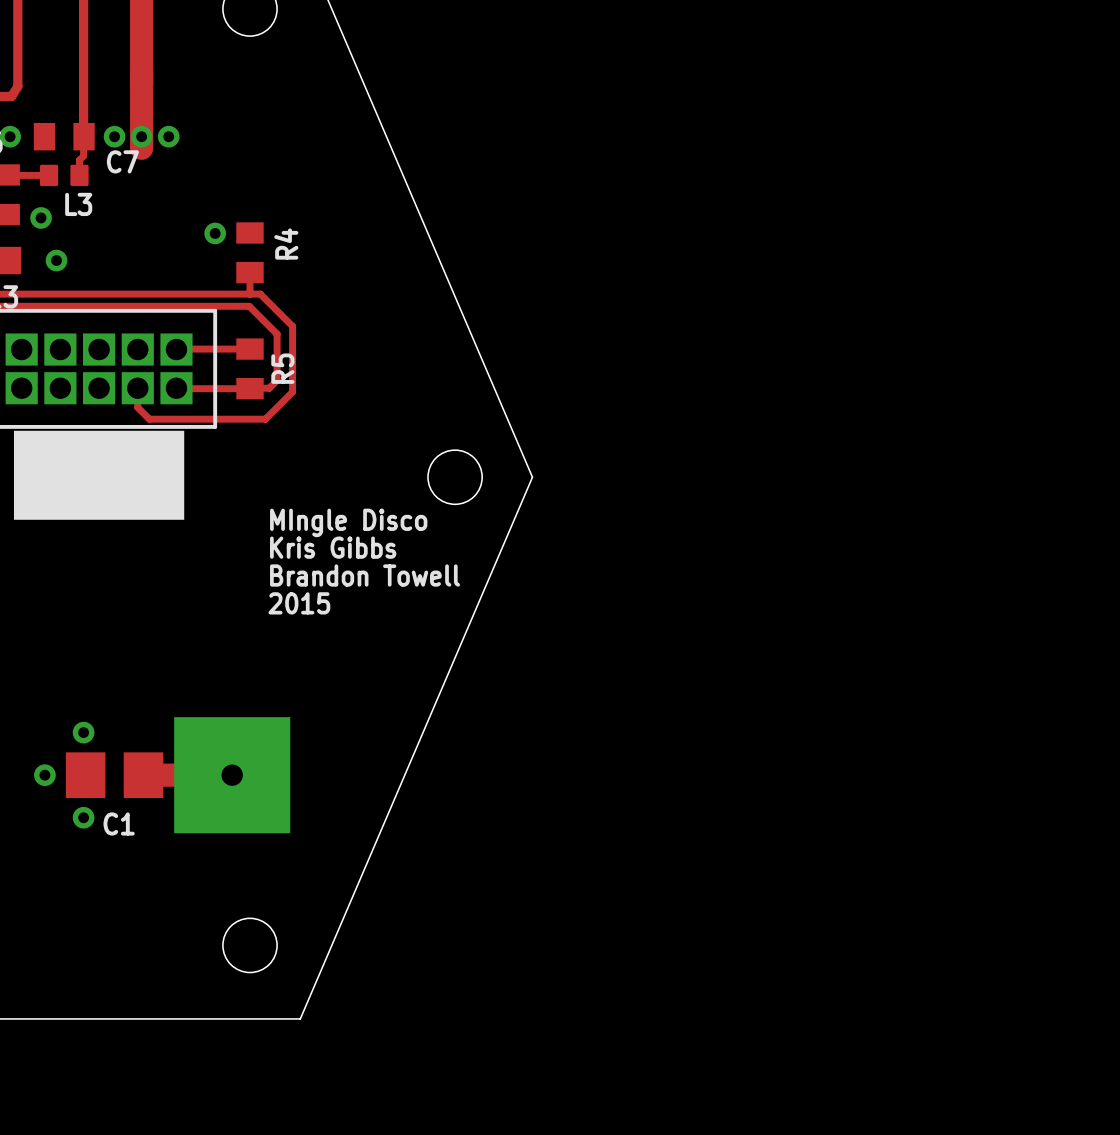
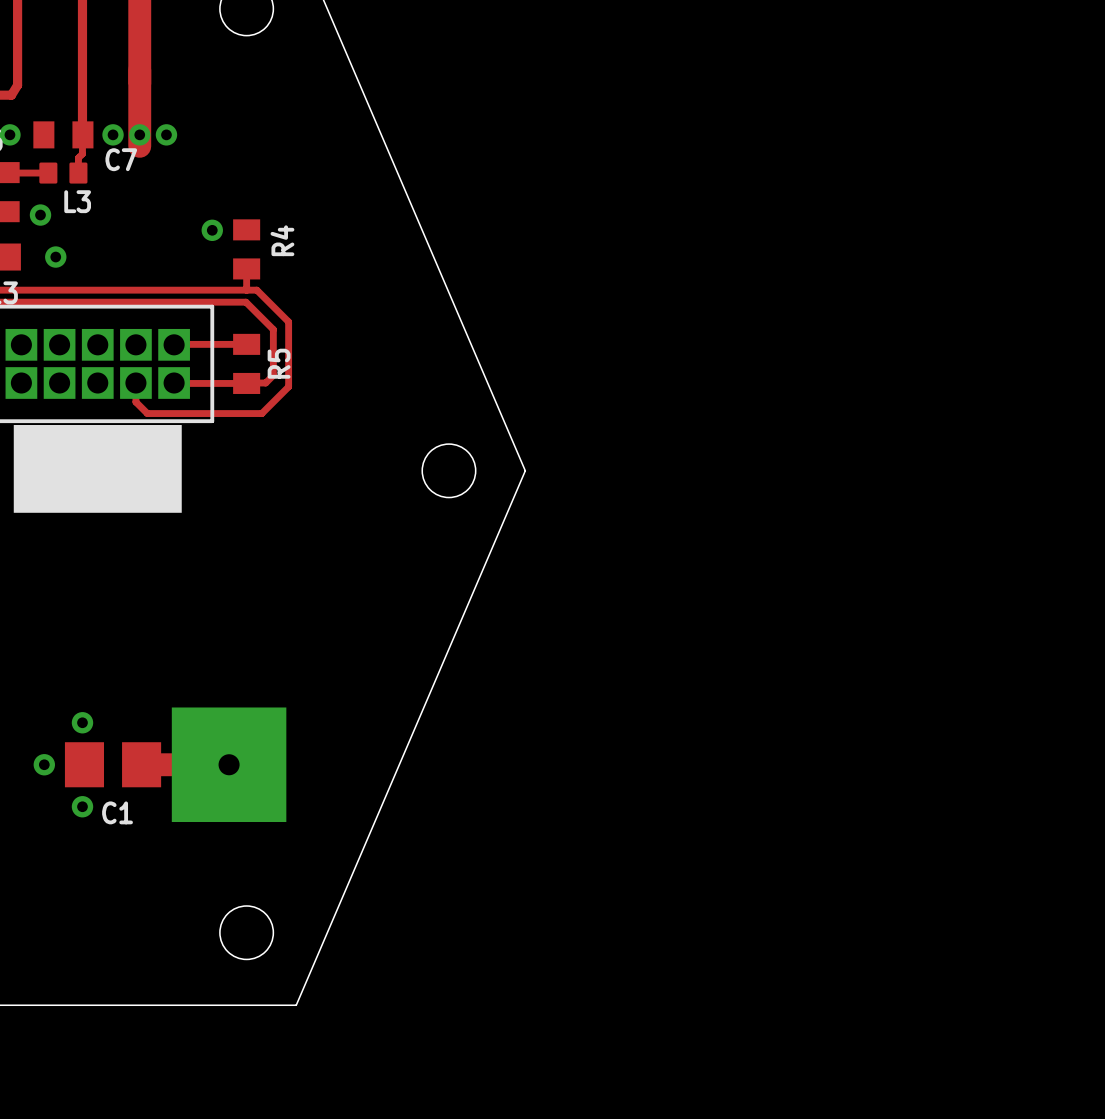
text: MIngle Disco (348, 522) -> none
text: Kris Gibbs (333, 547) -> none
text: Brandon Towell (365, 575) -> none
text: 2015 (299, 603) -> none

